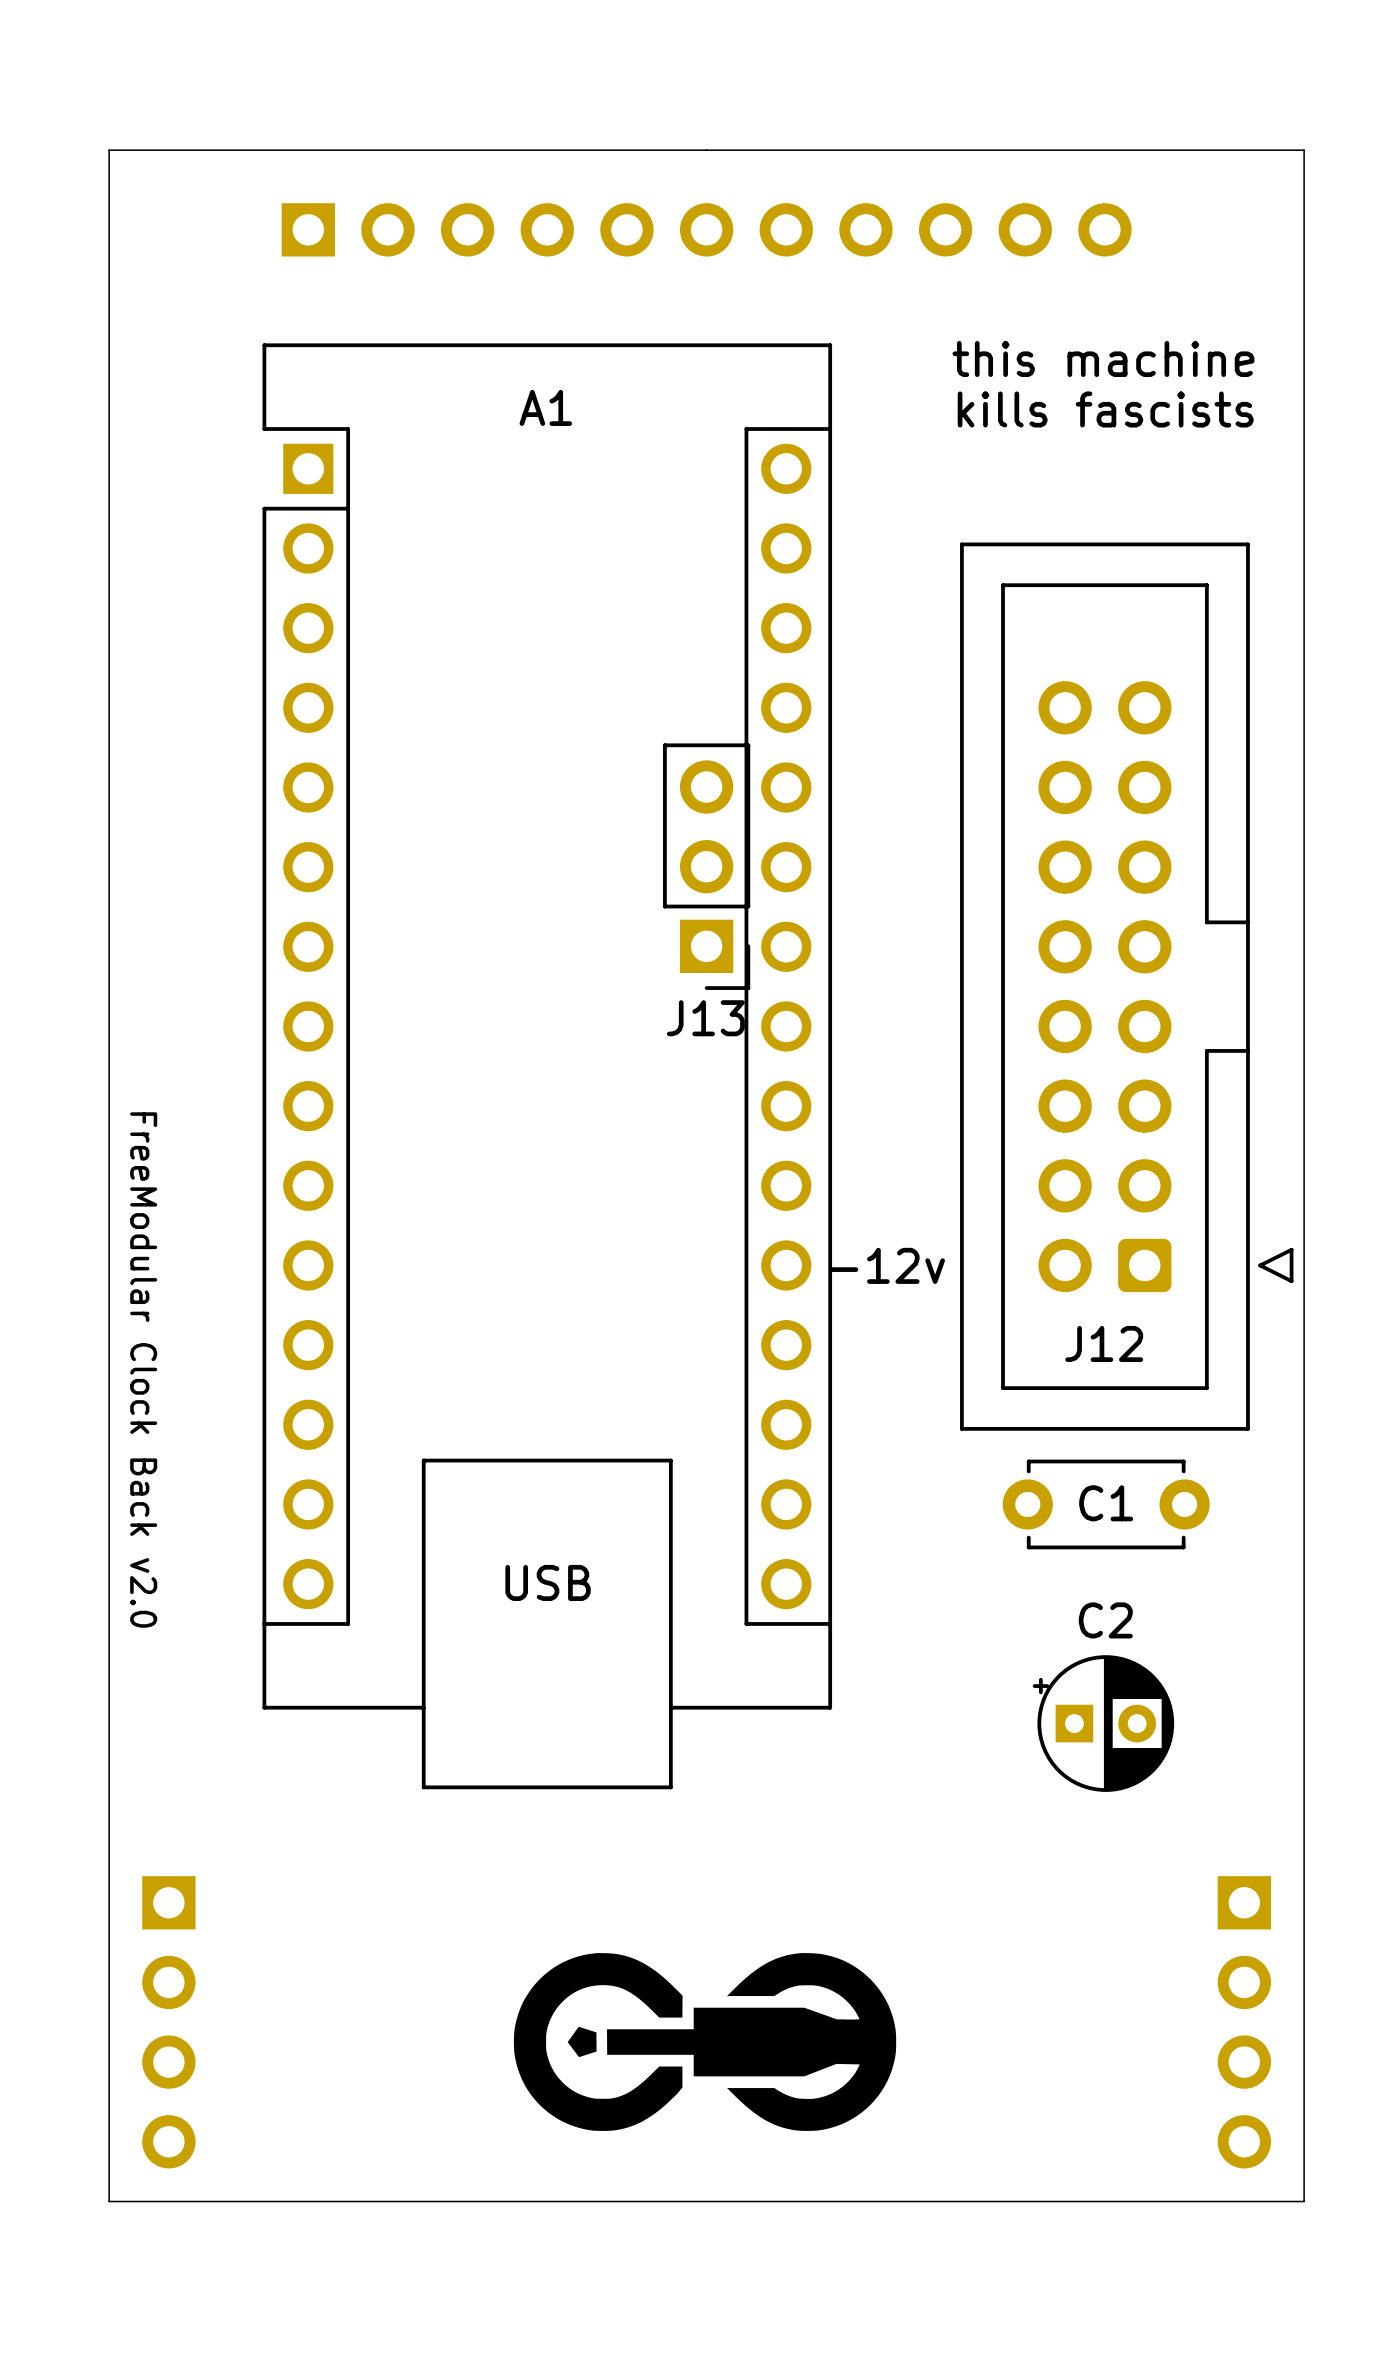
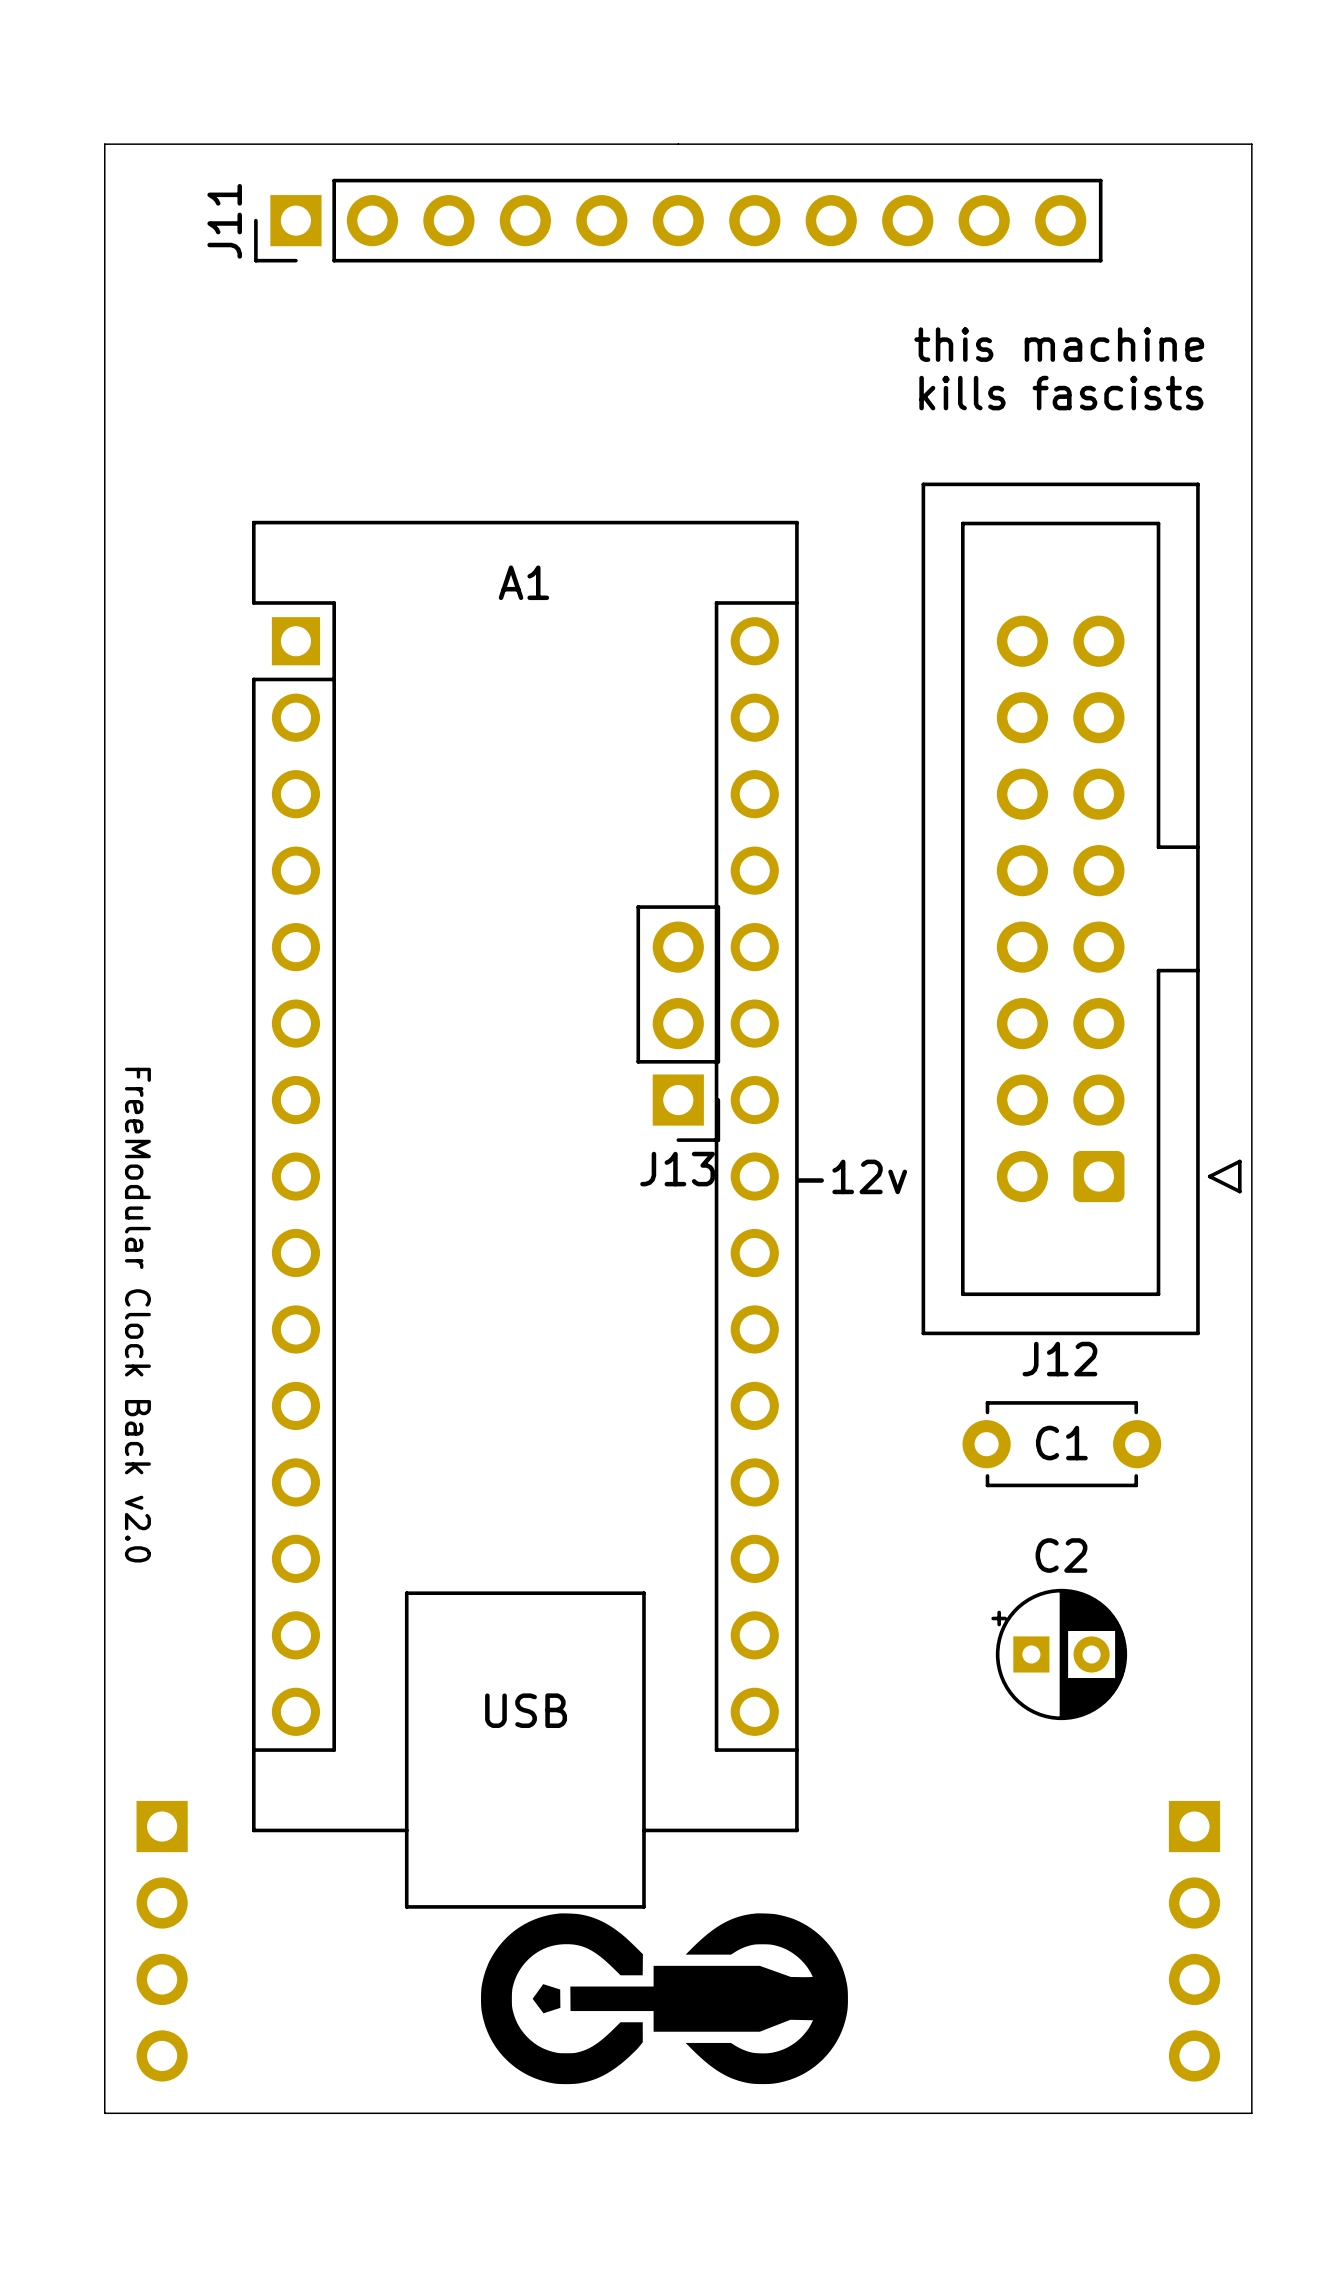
J11 side: bottom (706, 229) -> top (678, 220)
J13 position: (706, 866) -> (678, 1023)
J12 position: (1126, 986) -> (1081, 908)
A1 position: (547, 1066) -> (525, 1214)
text position: -12v (887, 1265) -> -12v (851, 1176)
J12 name position: J12 (1104, 1343) -> J12 (1059, 1359)
drawing position: (705, 2042) -> (664, 1998)

